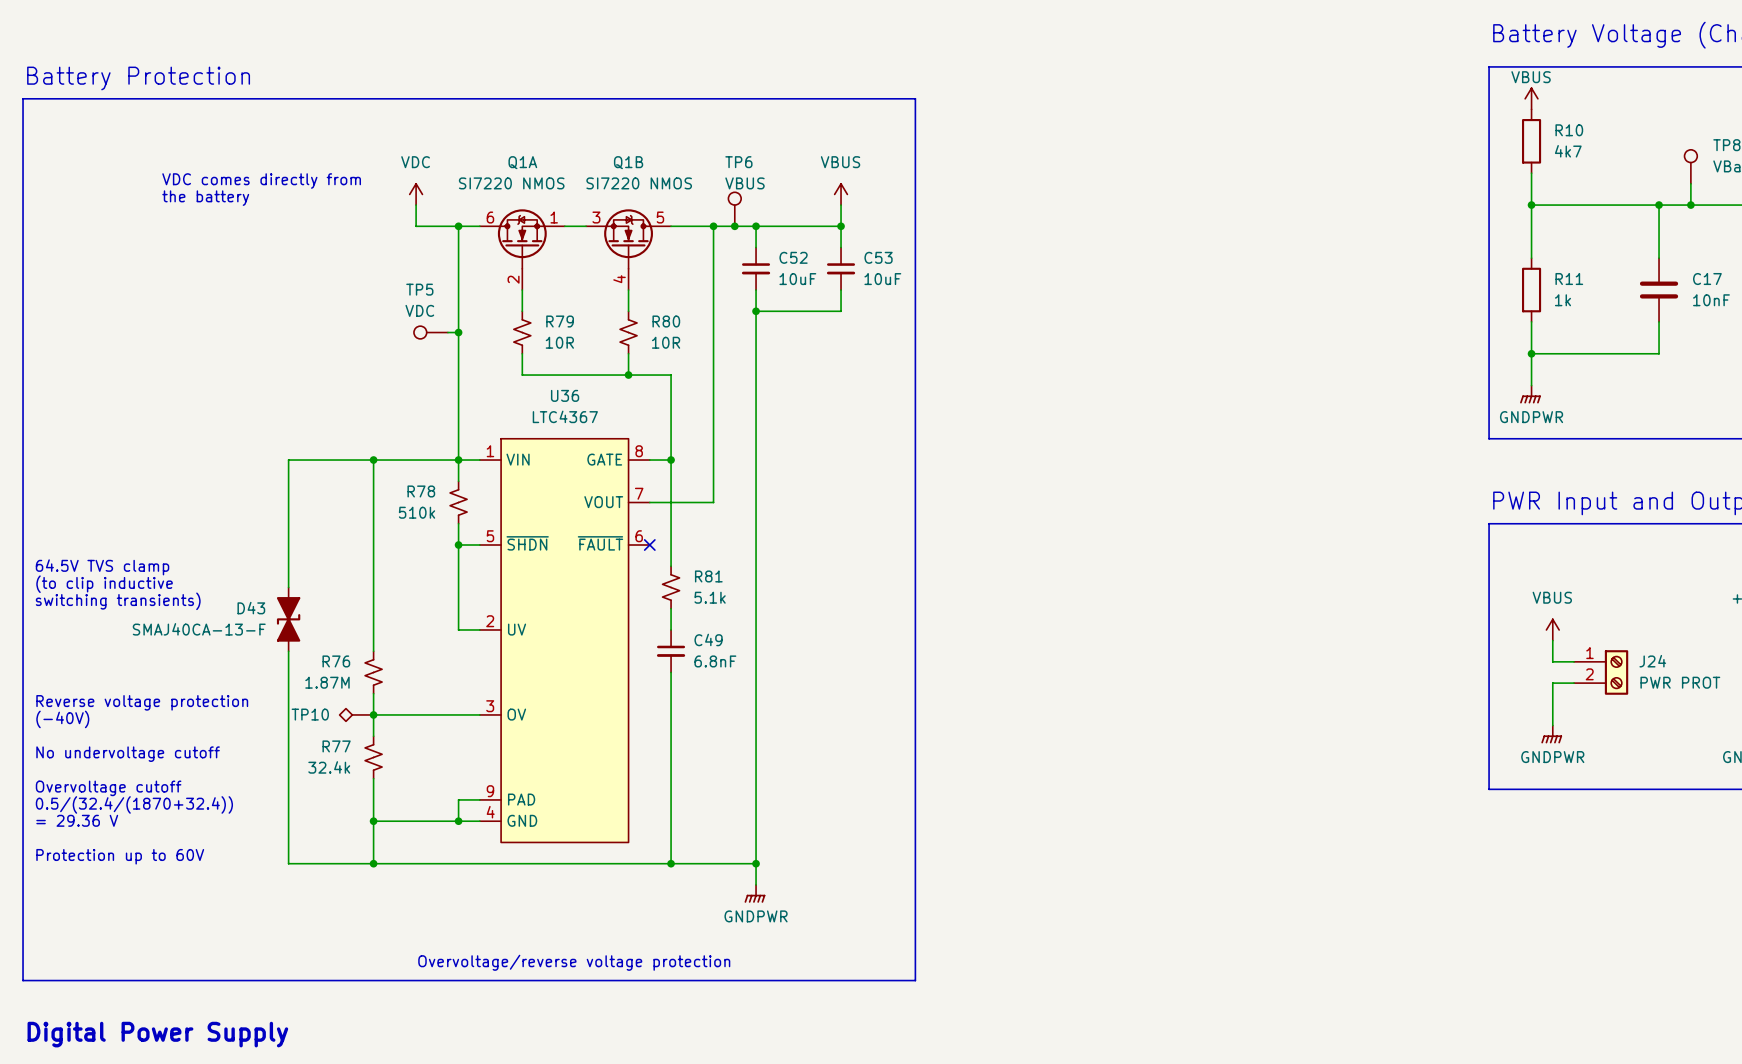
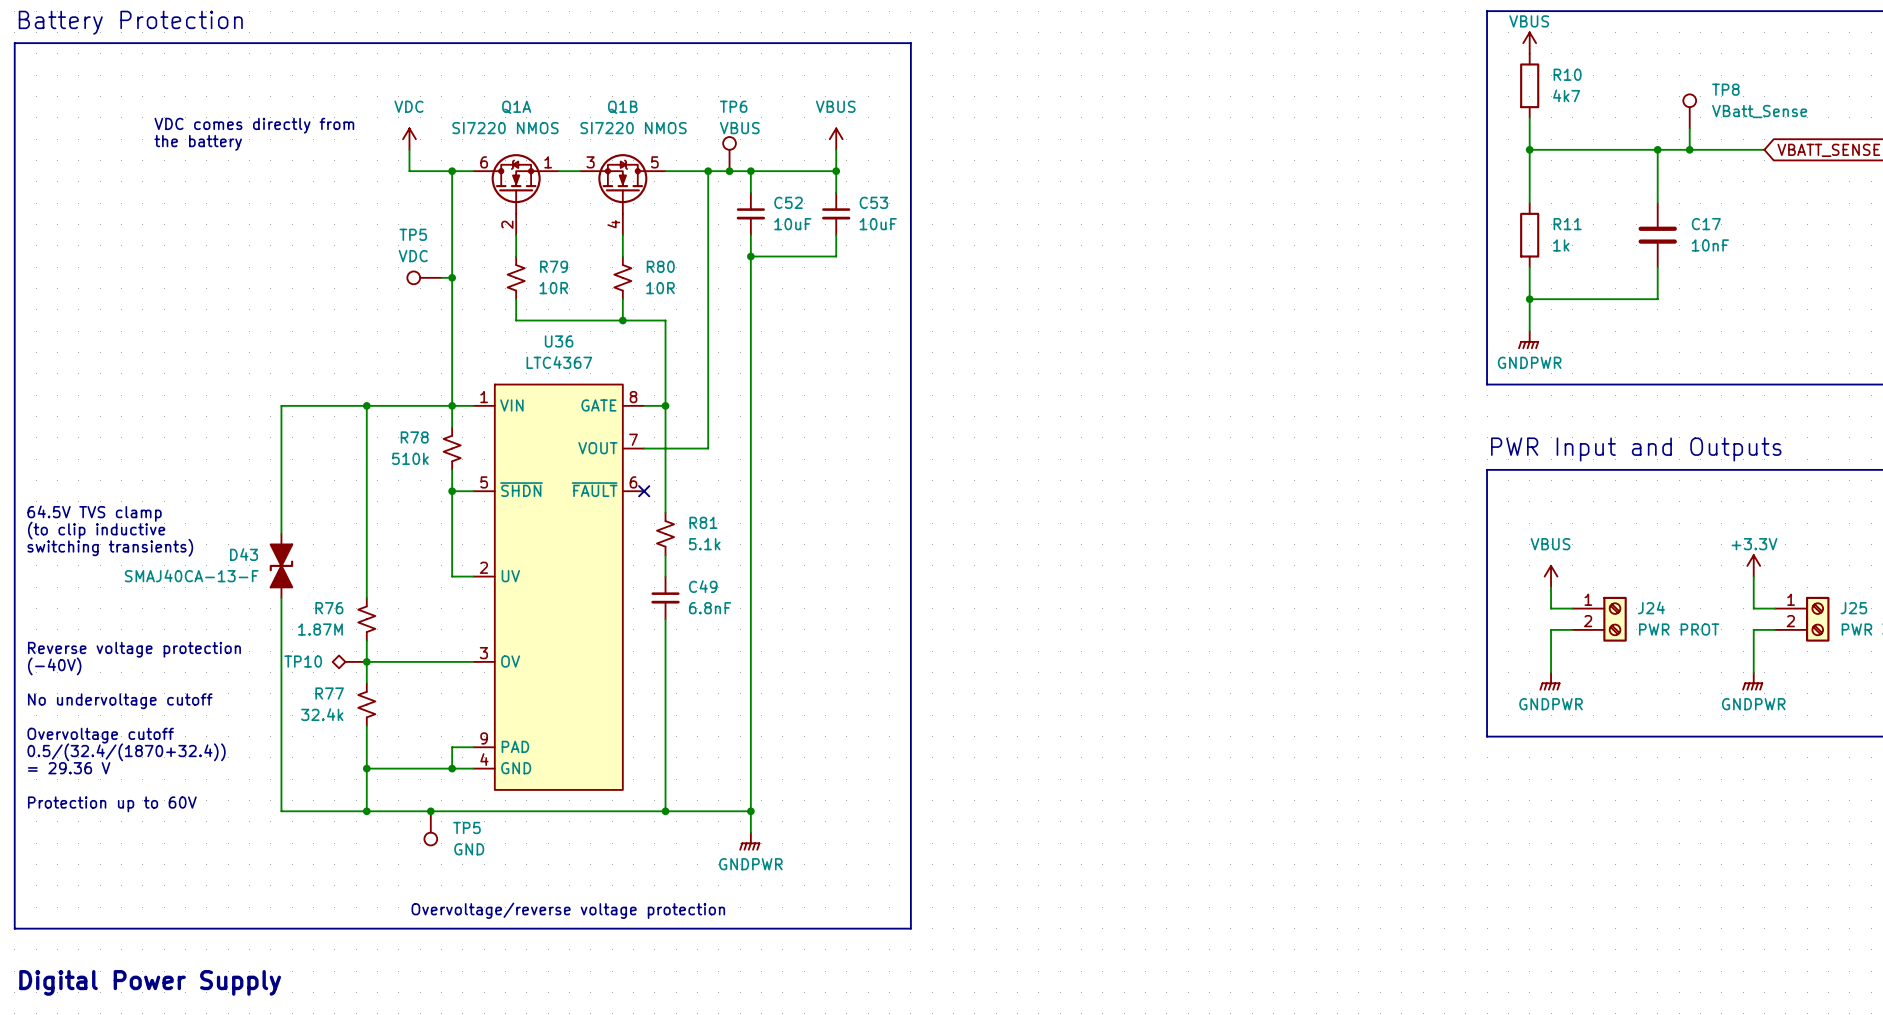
junction: none -> (430, 811)
TP5: none -> GND (430, 828)

